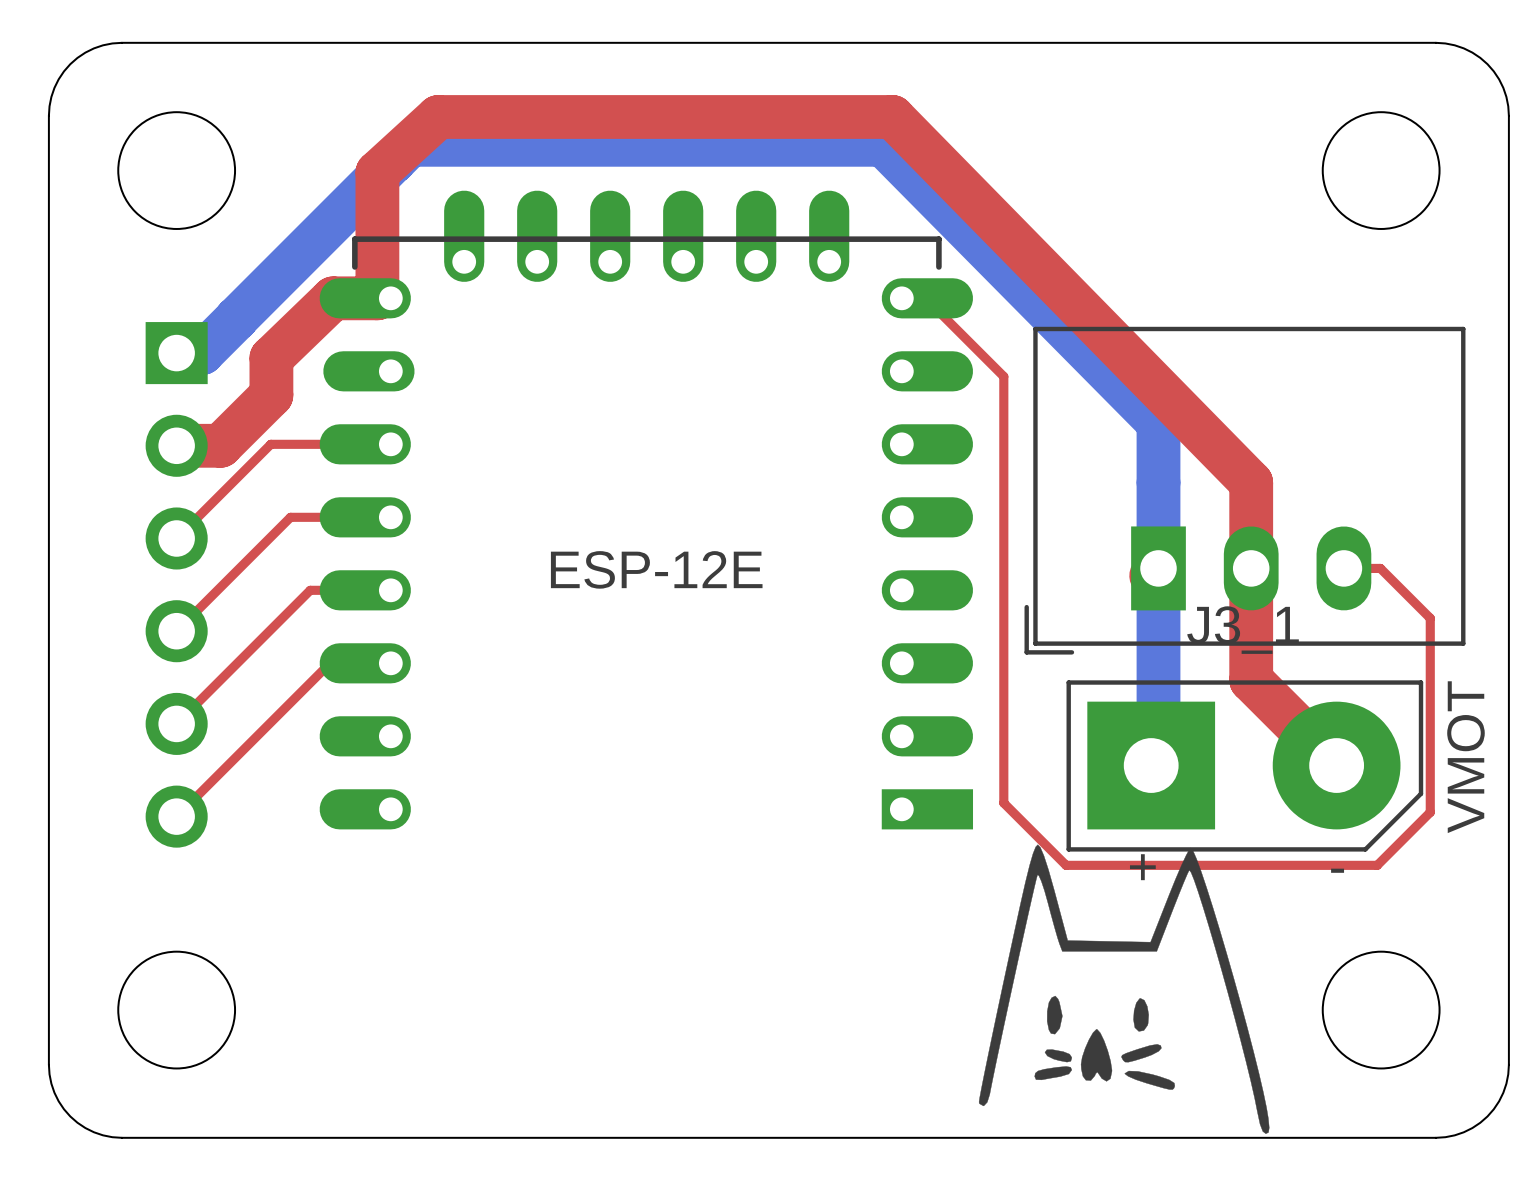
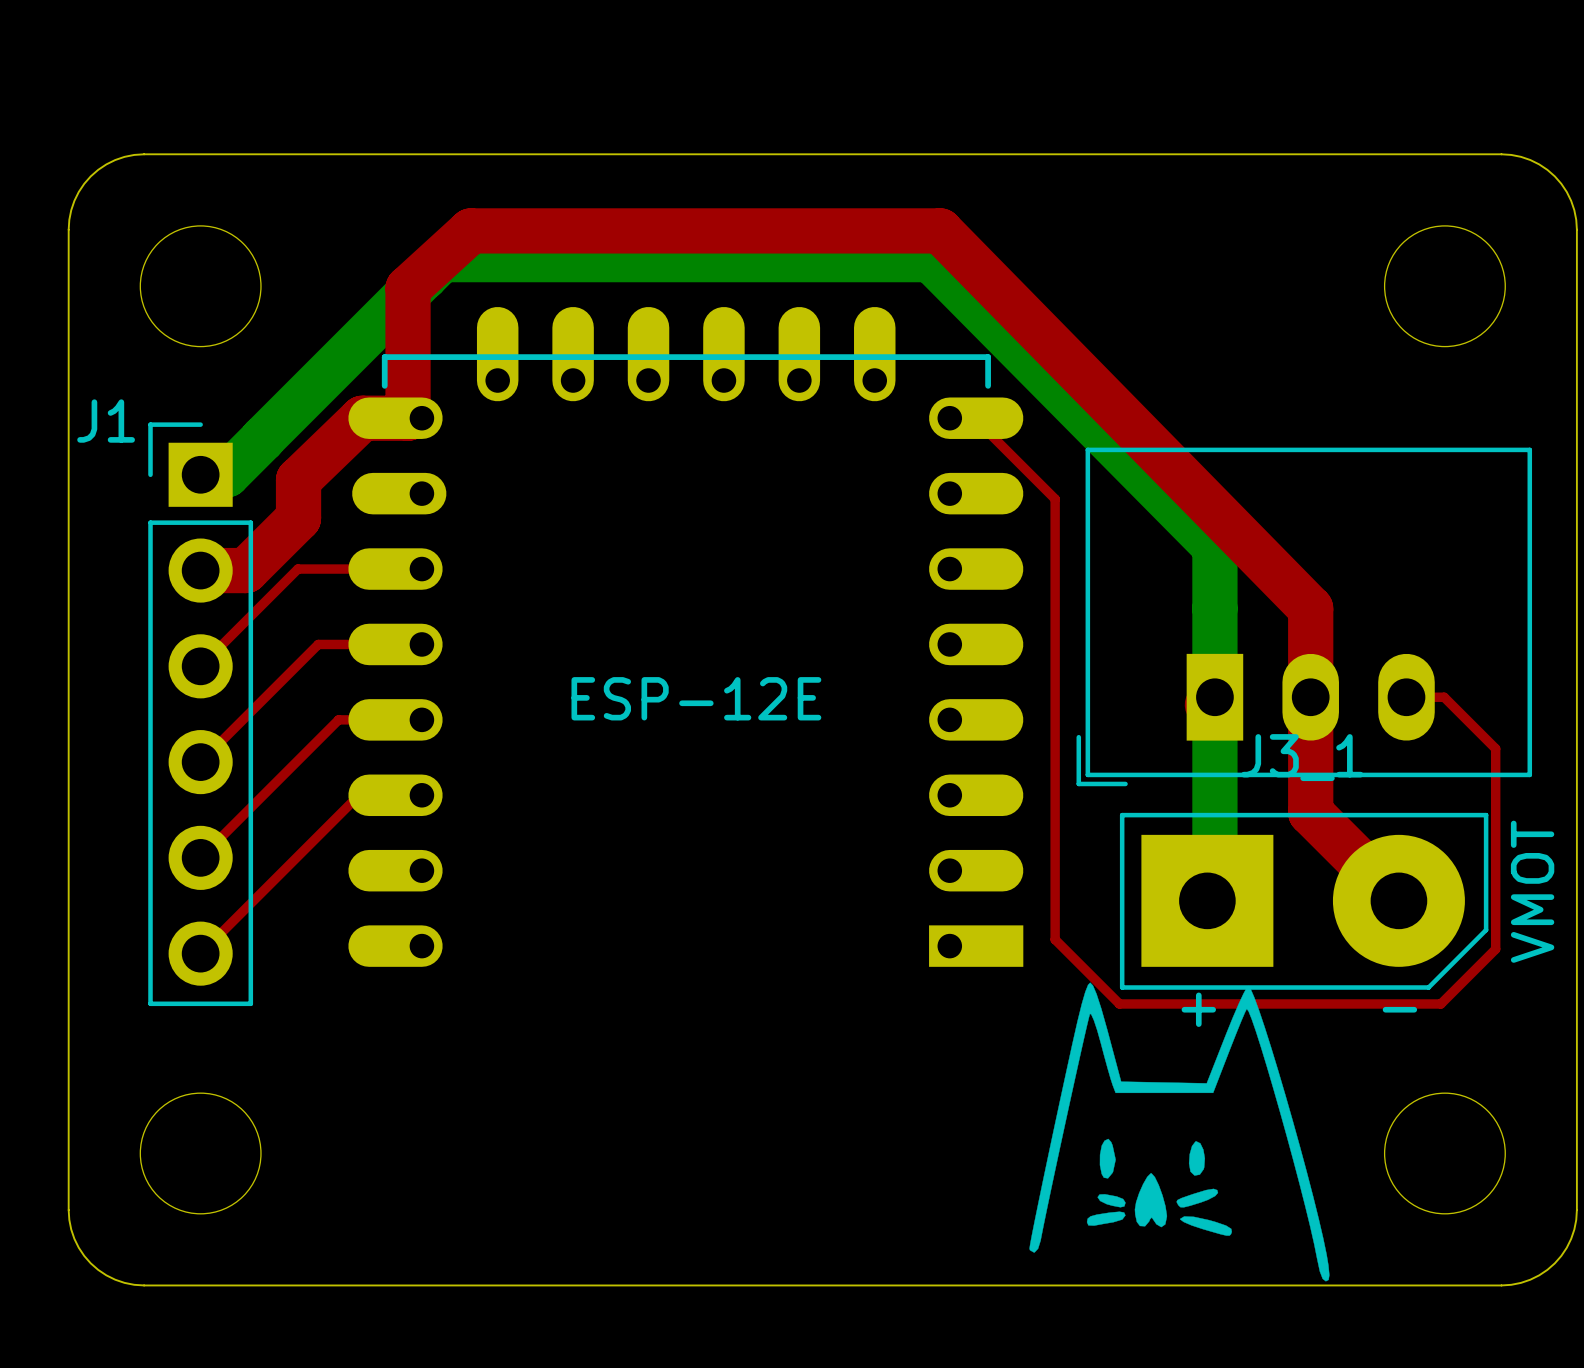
J1 side: bottom (176, 584) -> top (200, 714)

